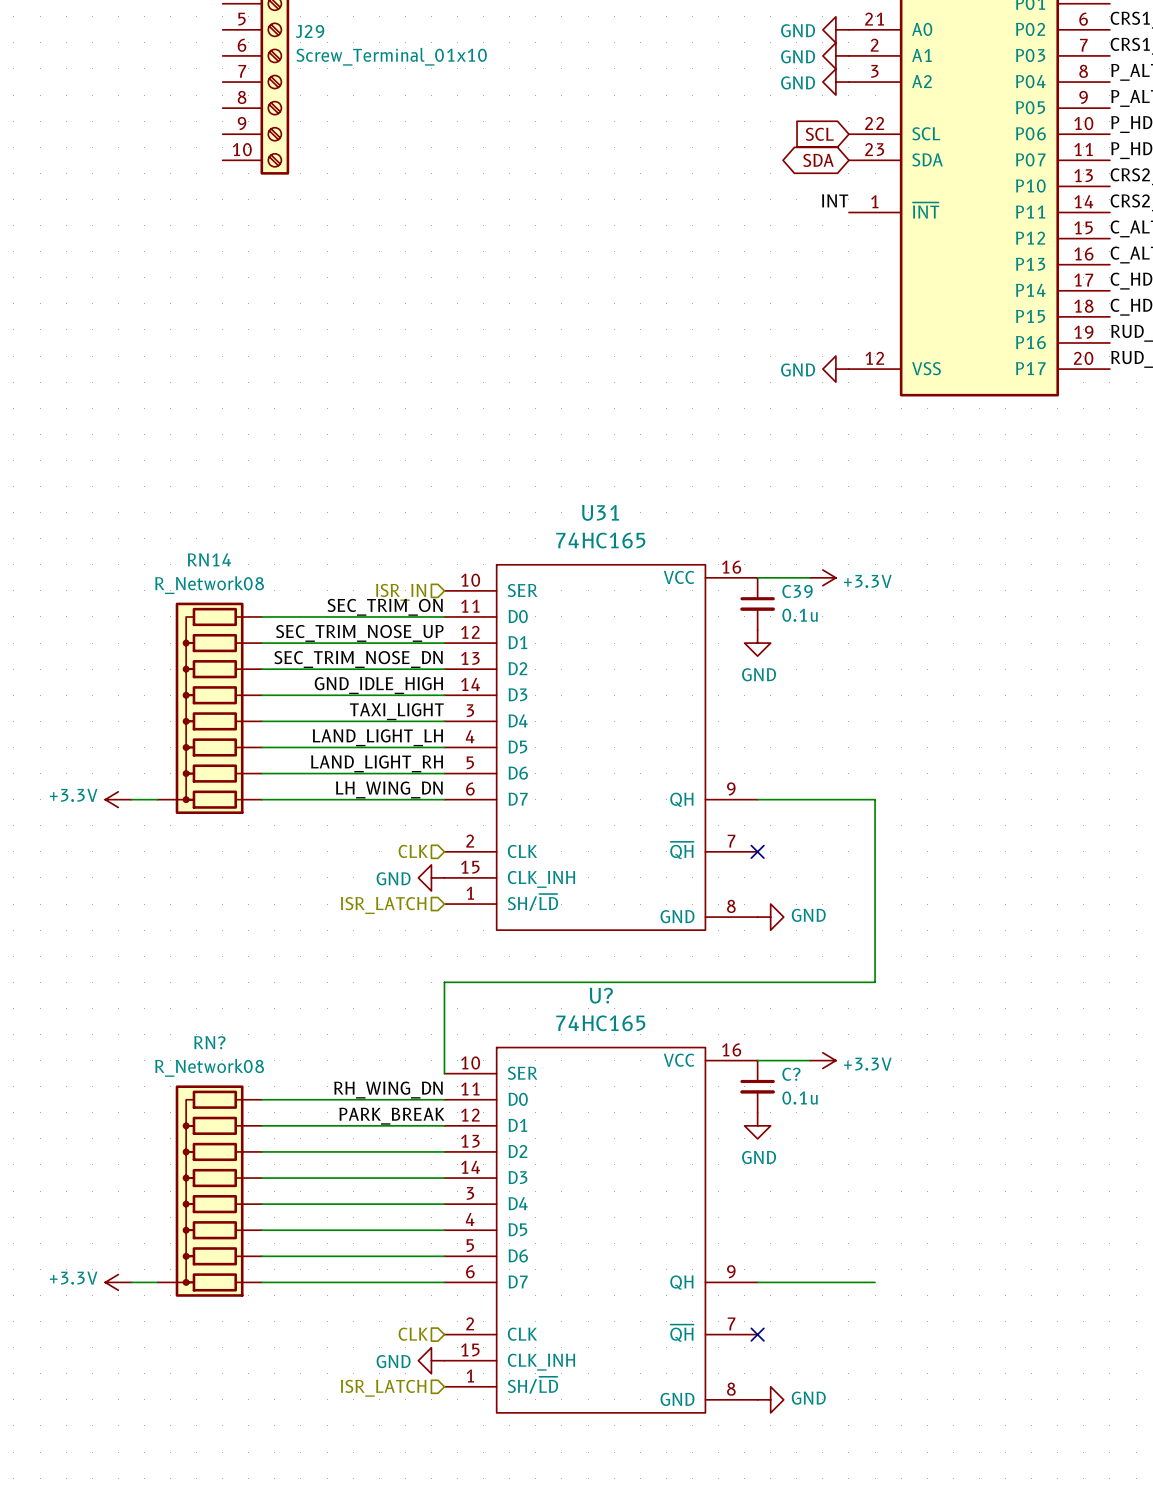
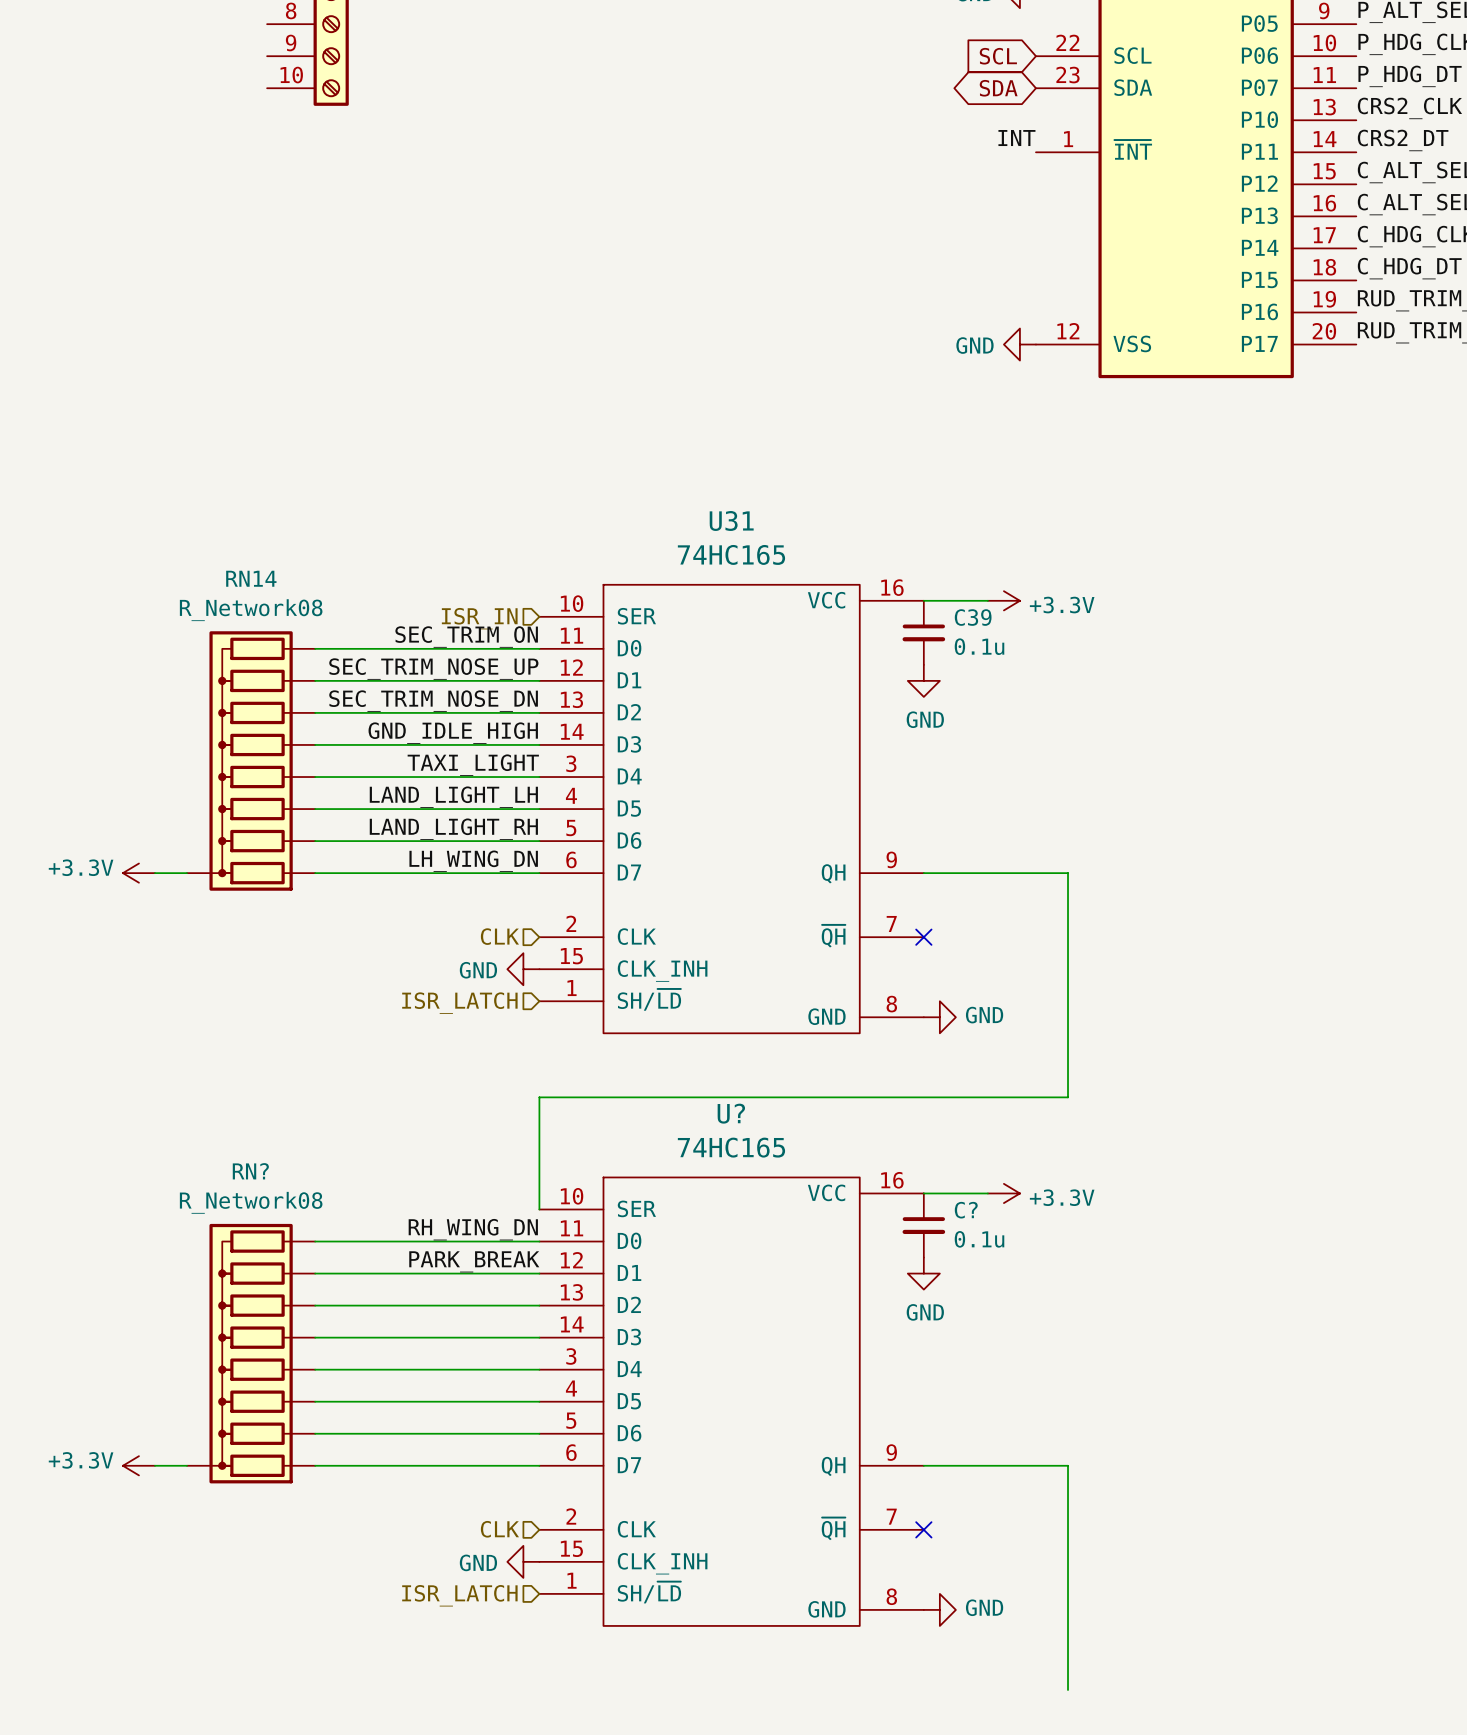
wire: none -> (1068, 1465) (1068, 1690)

